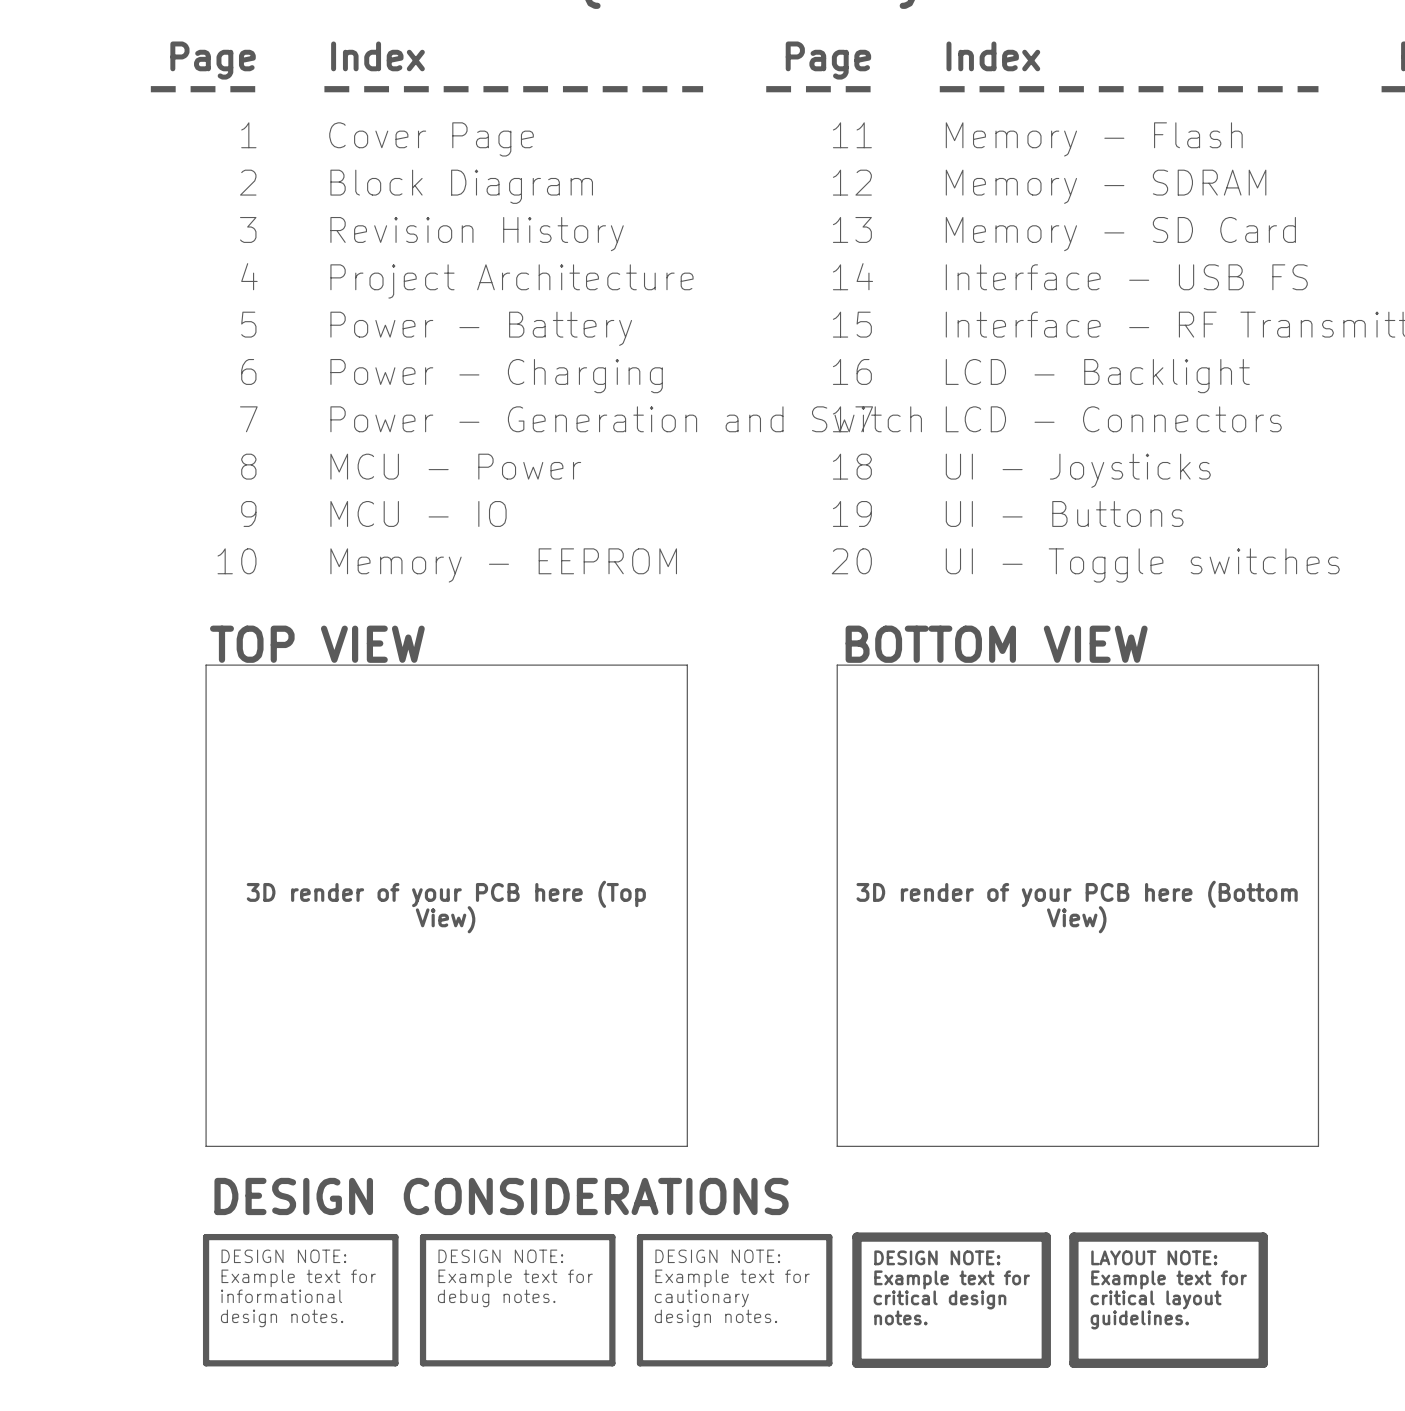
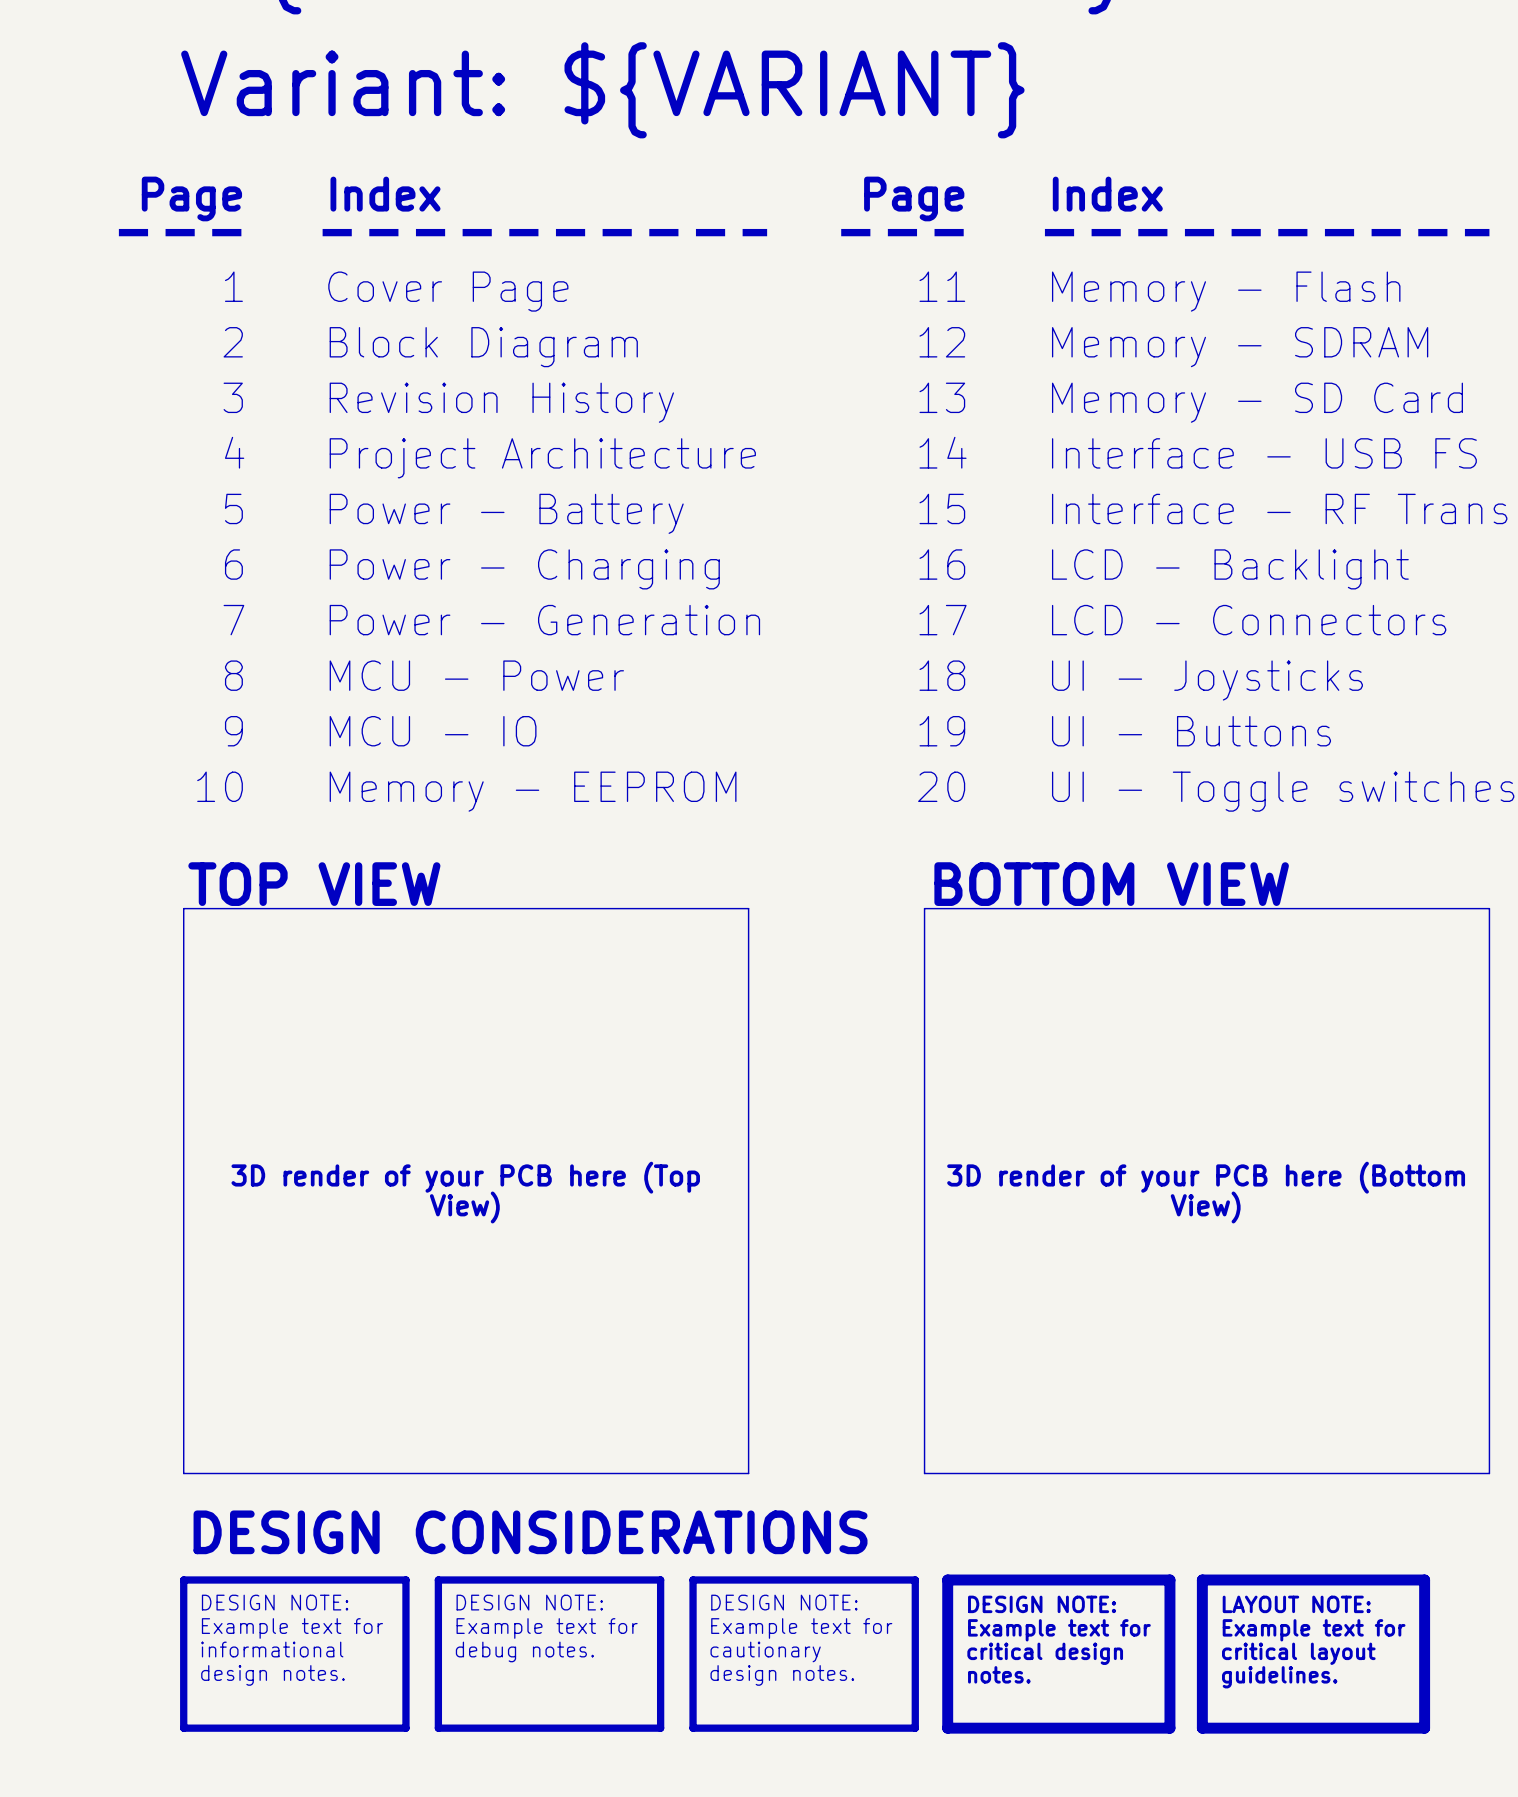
text: Power - Generation and Switch (626, 419) -> Power - Generation (544, 620)

